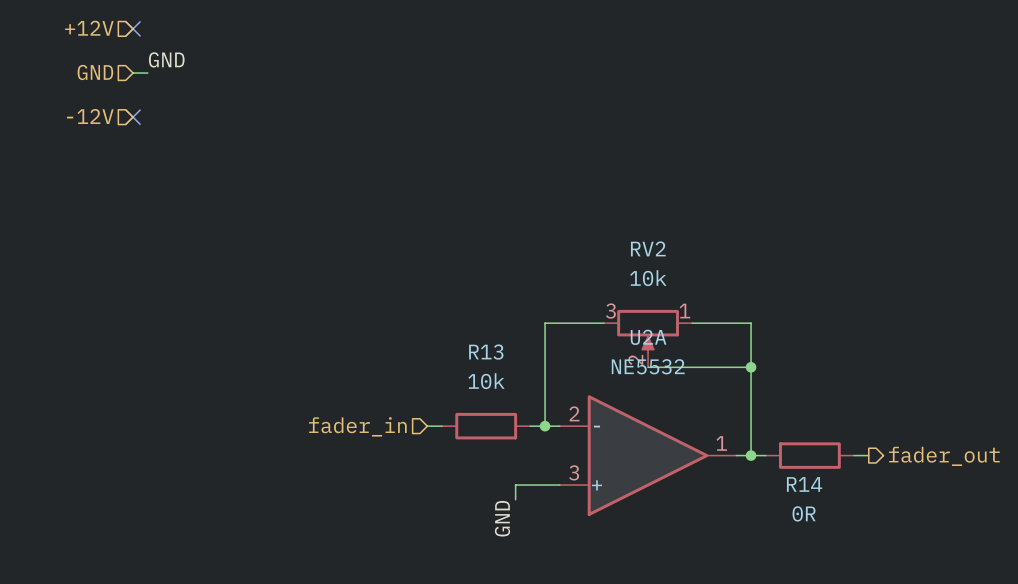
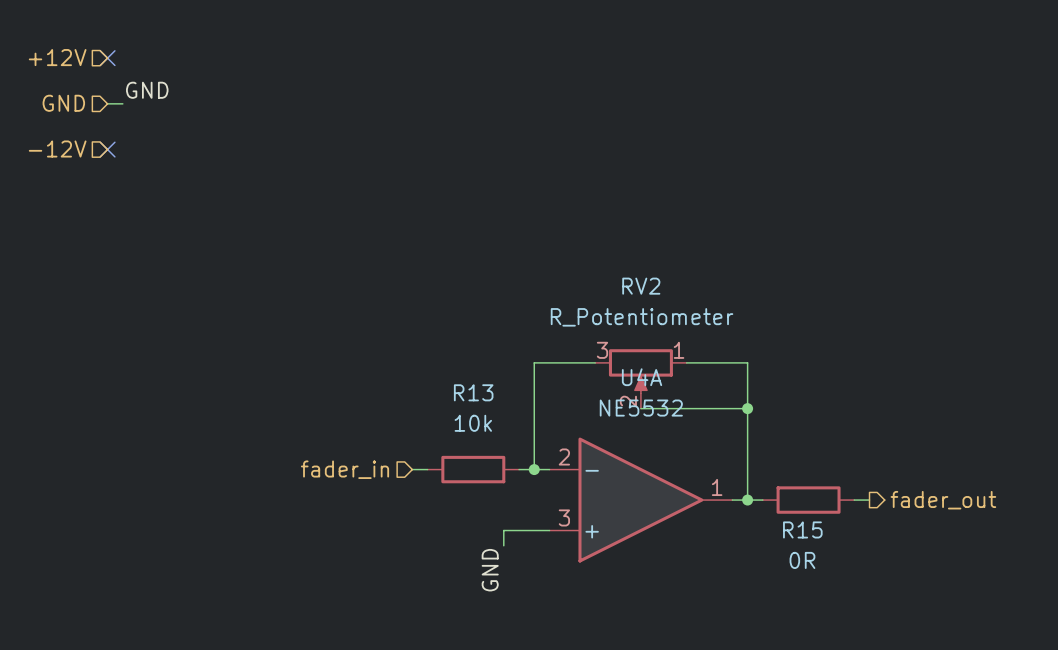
RV2 value: 10k (648, 278) -> R_Potentiometer (642, 317)
U2A name: U2A (648, 337) -> U4A (642, 377)
R14 name: R14 (804, 484) -> R15 (802, 529)

